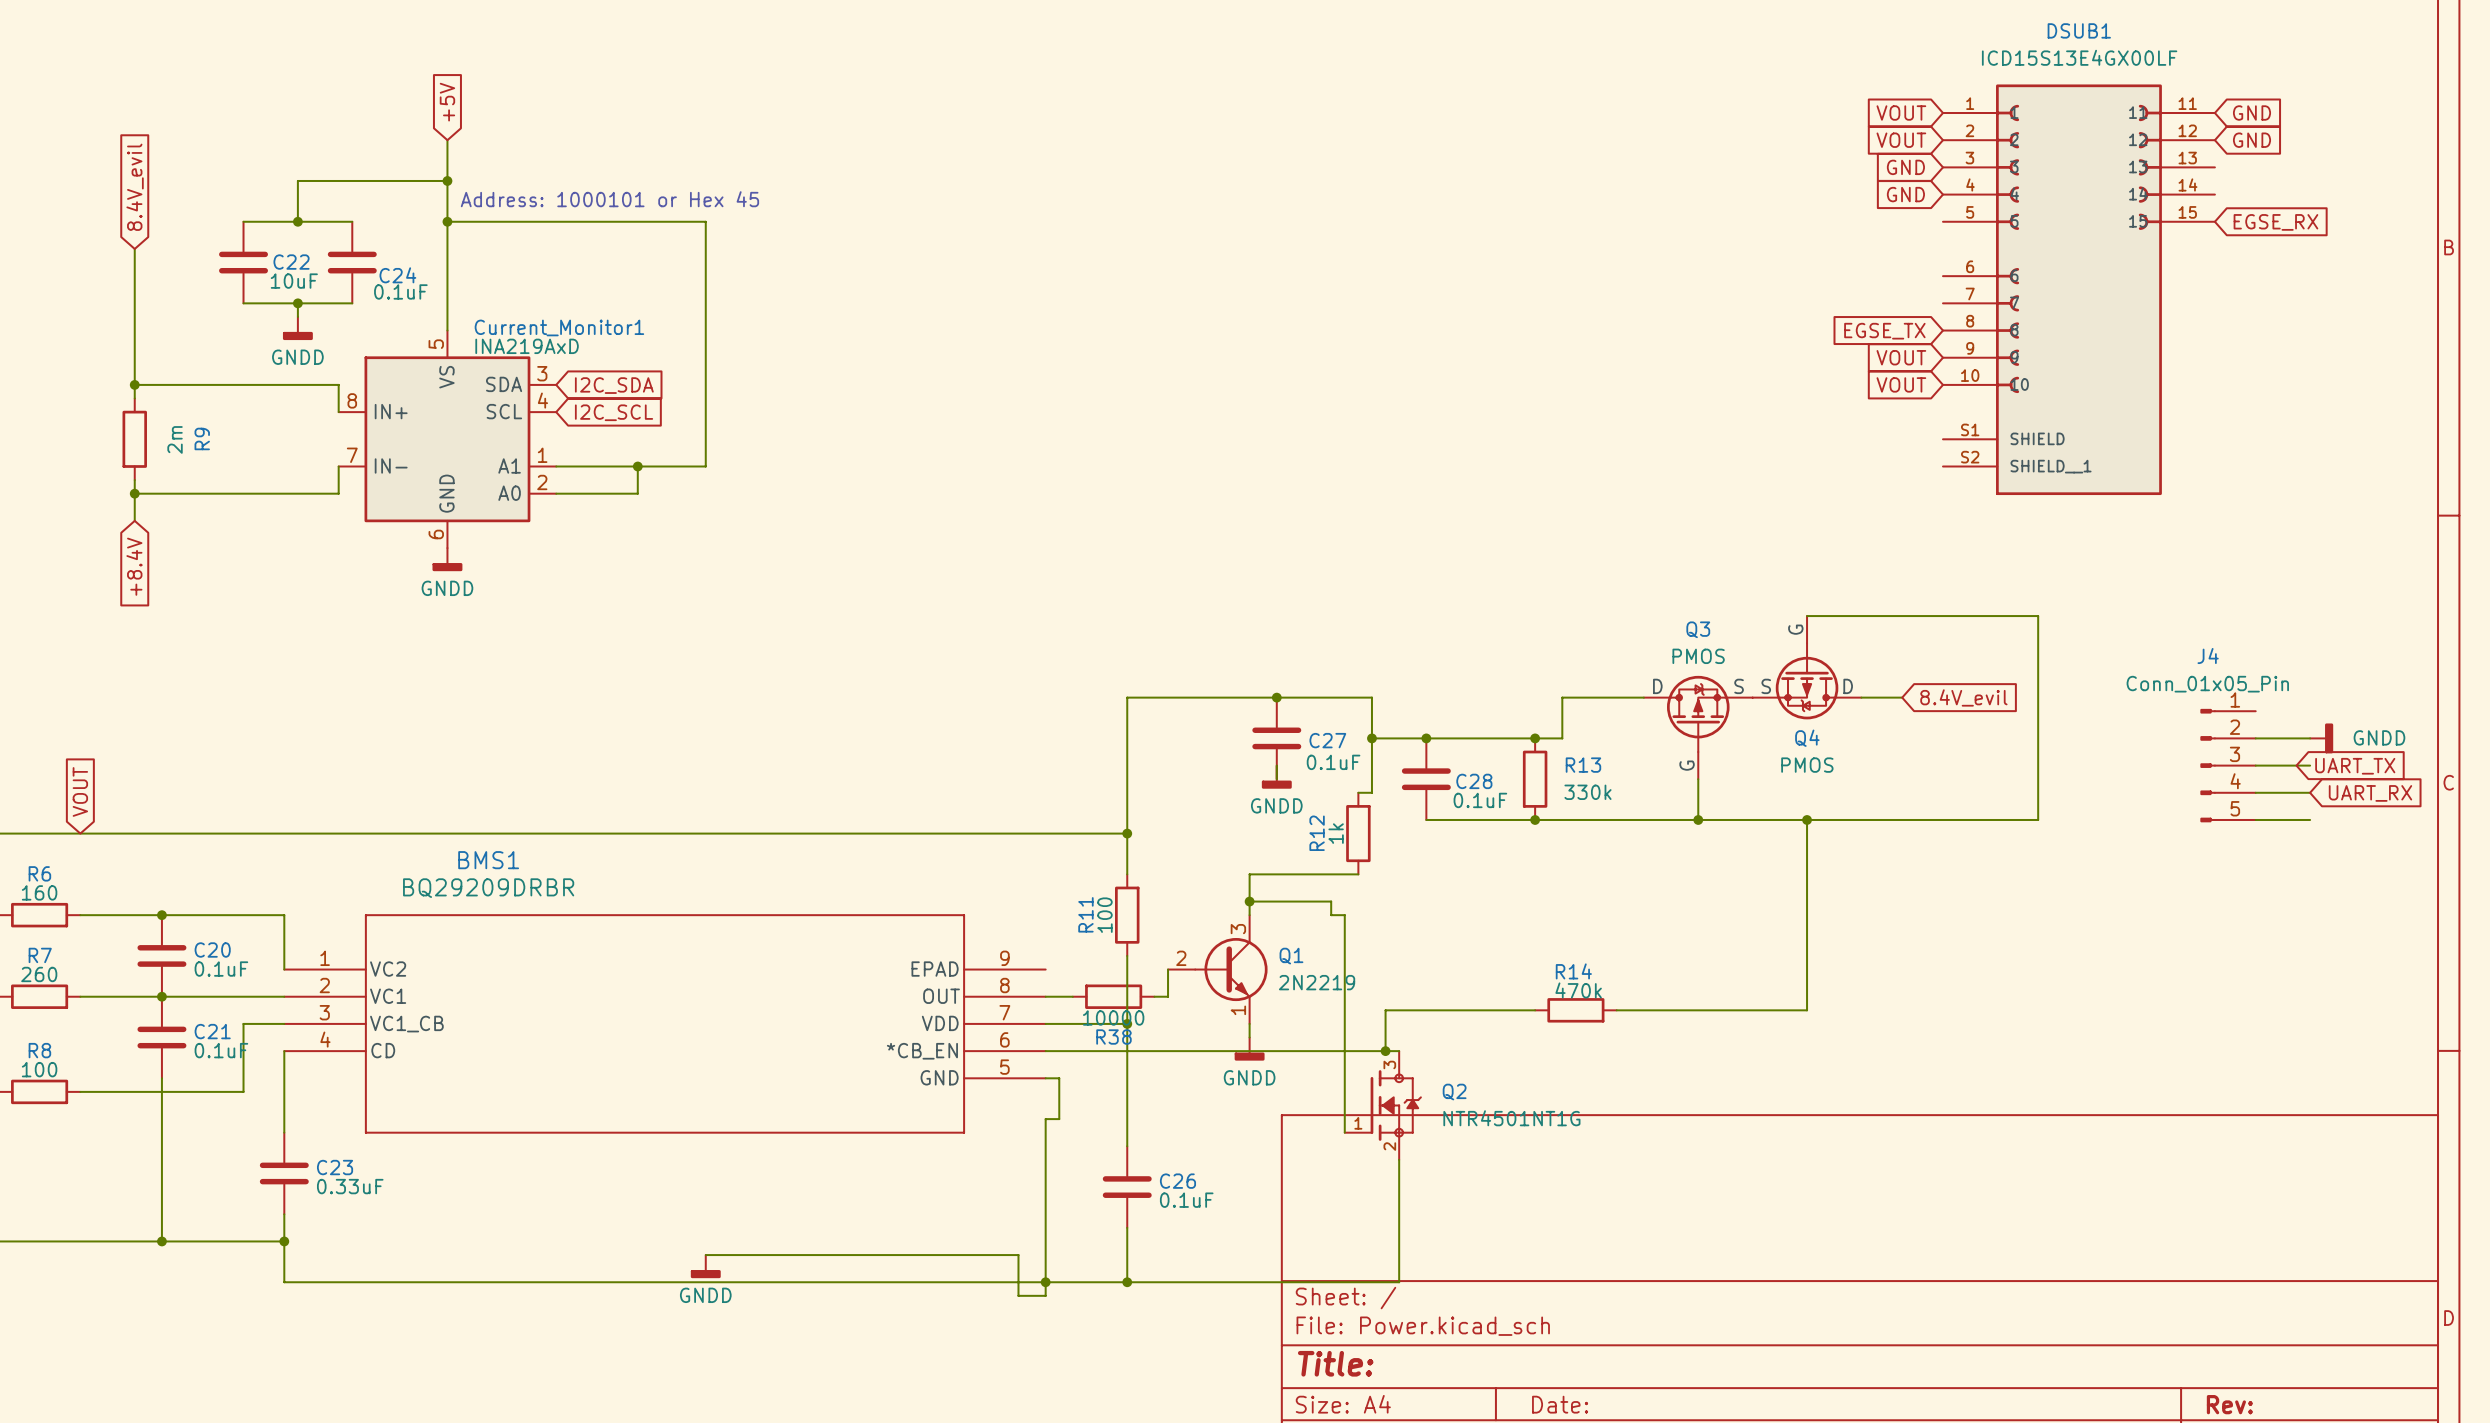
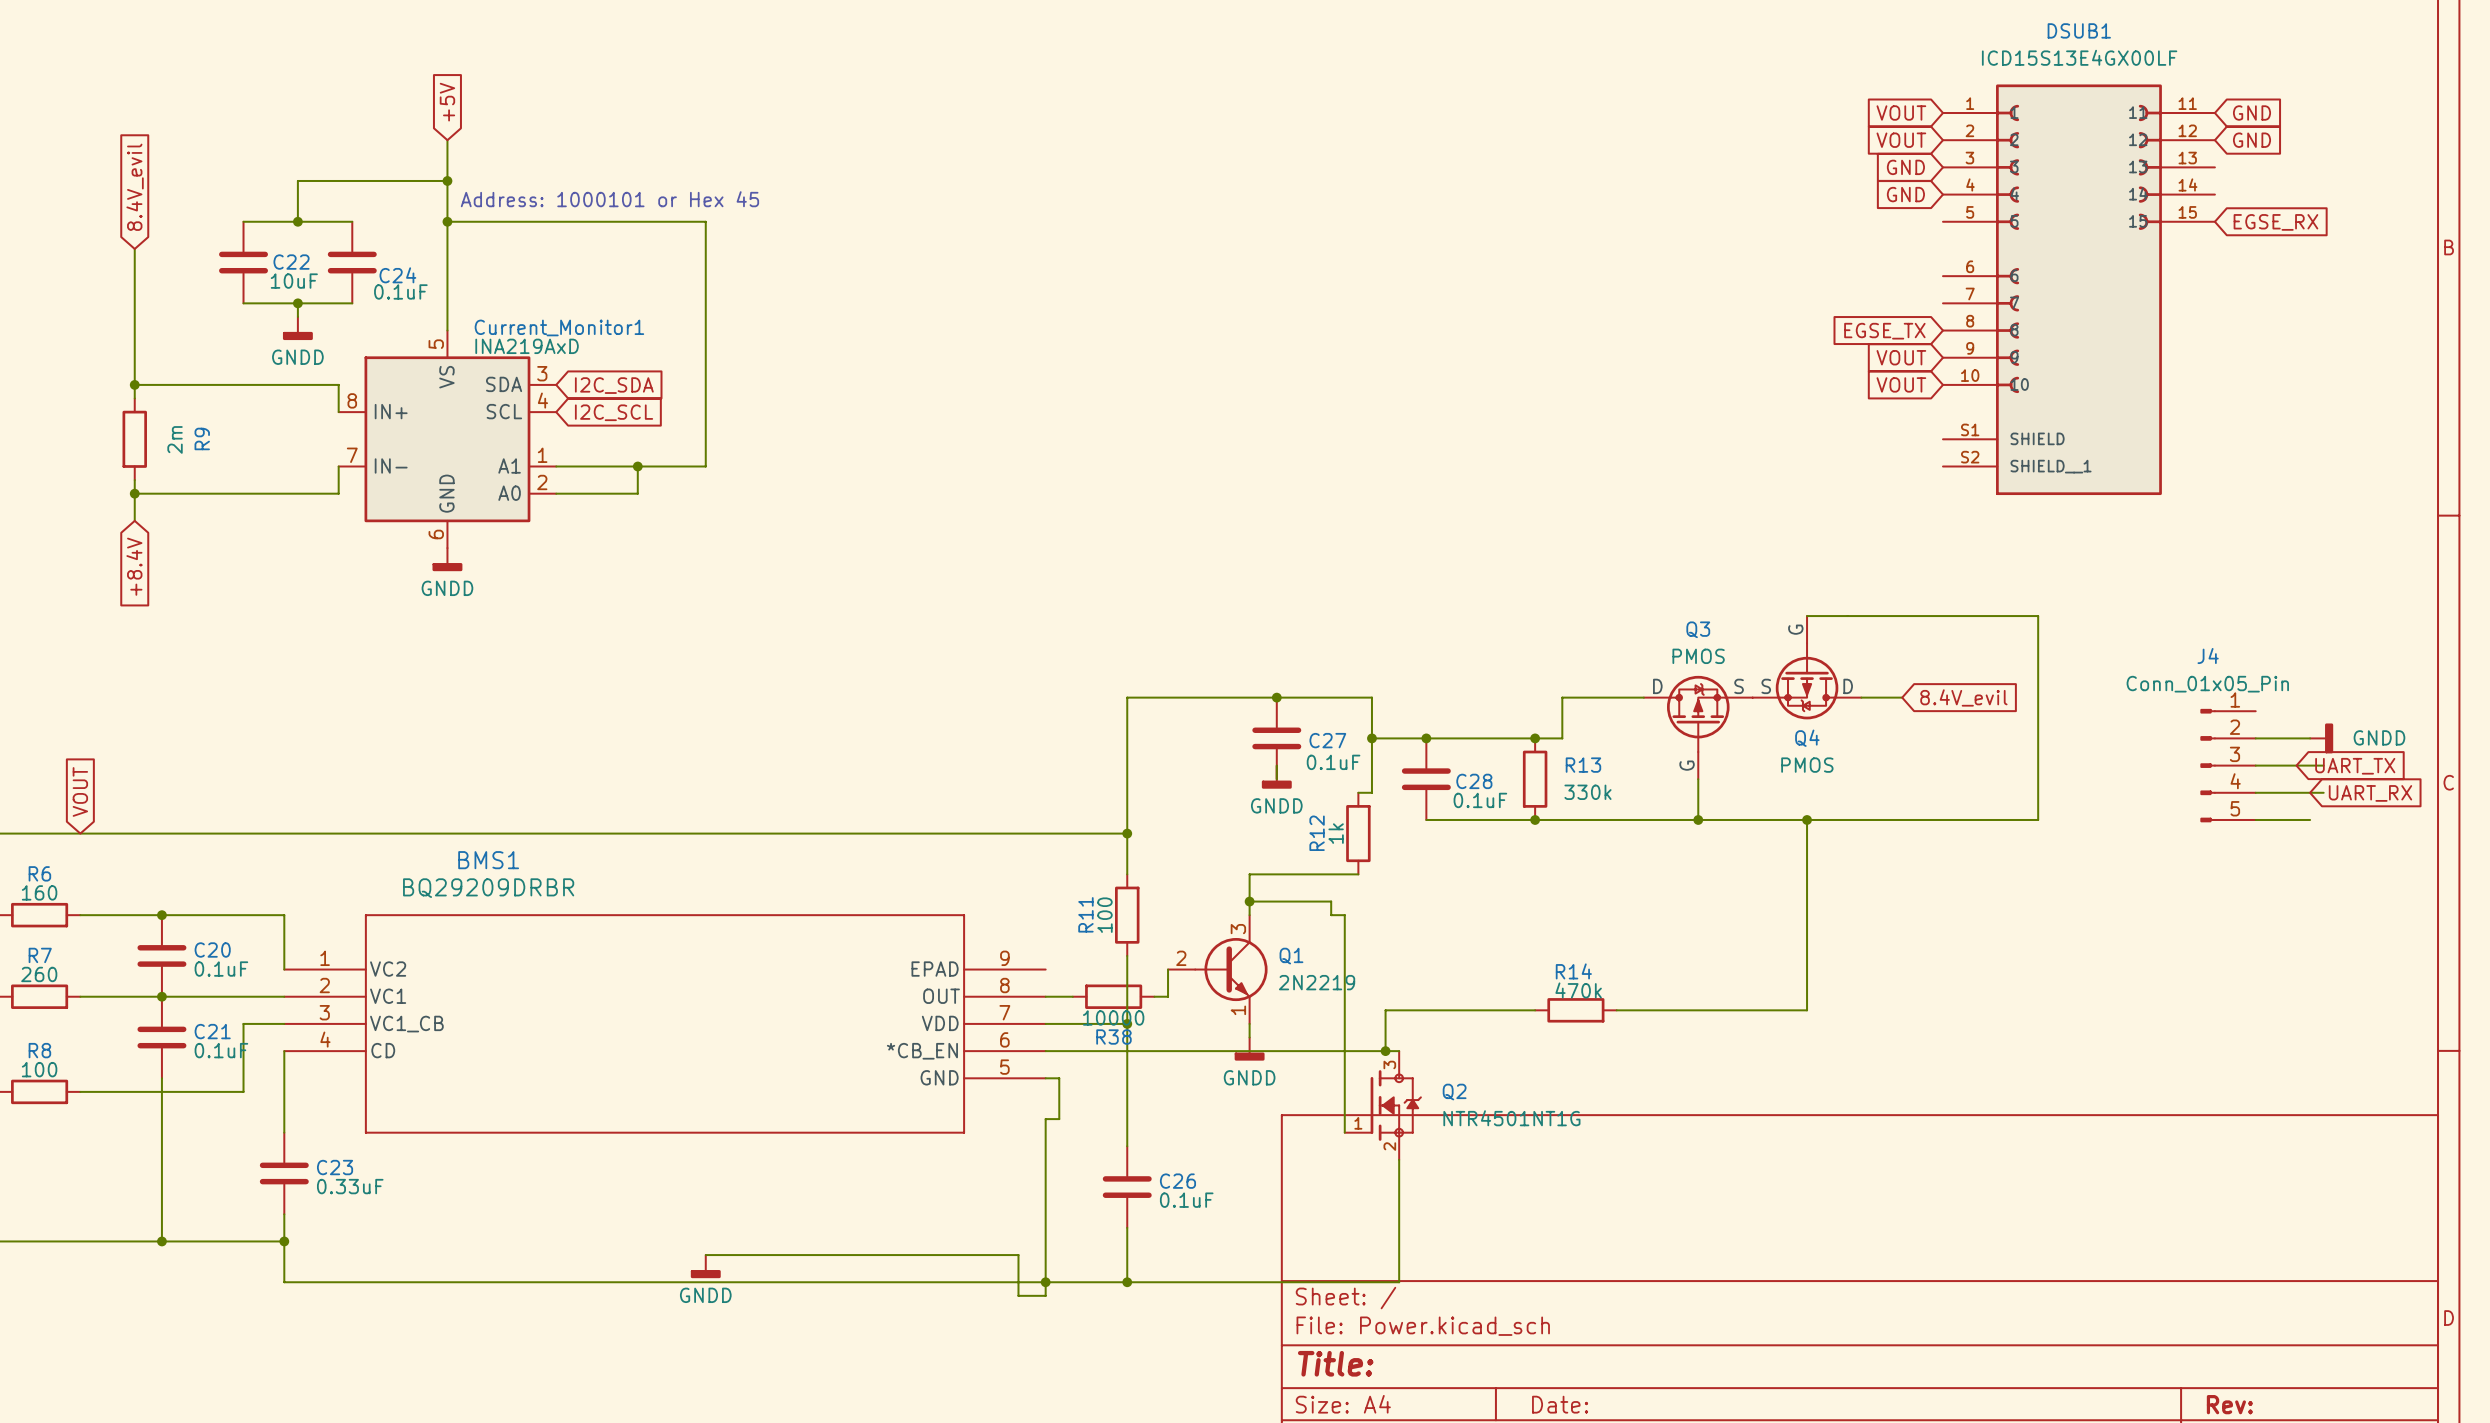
wire: none -> (2310, 765) (2323, 765)
wire: none -> (2310, 792) (2323, 792)

